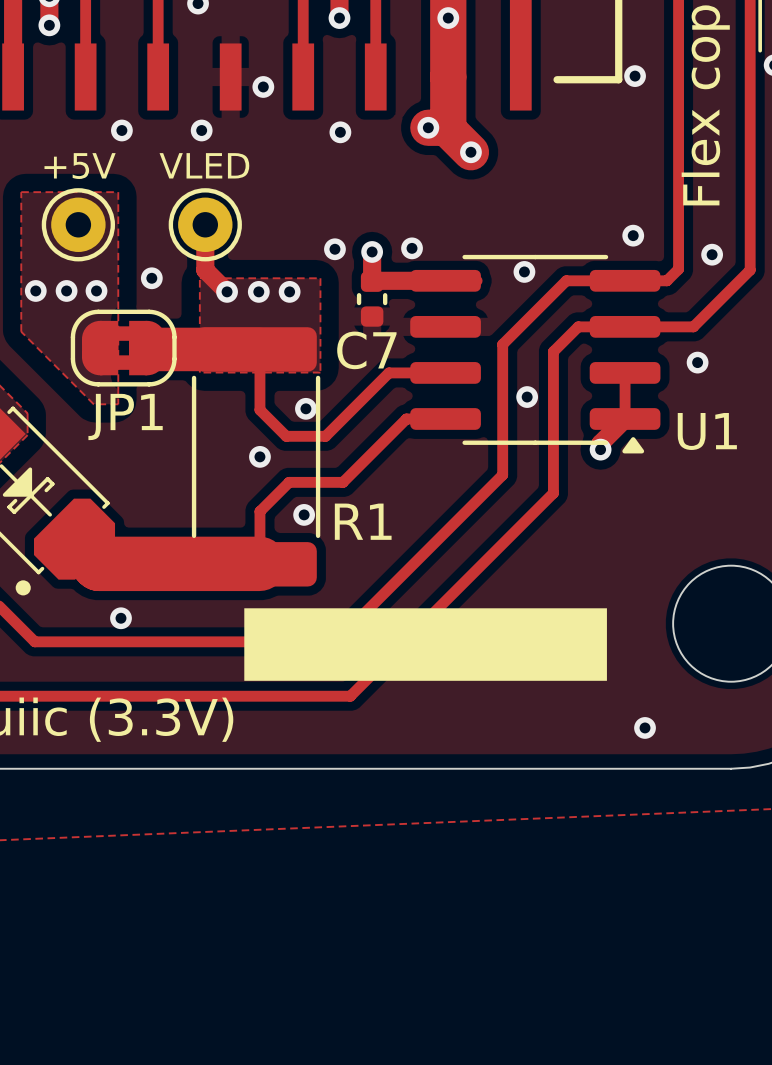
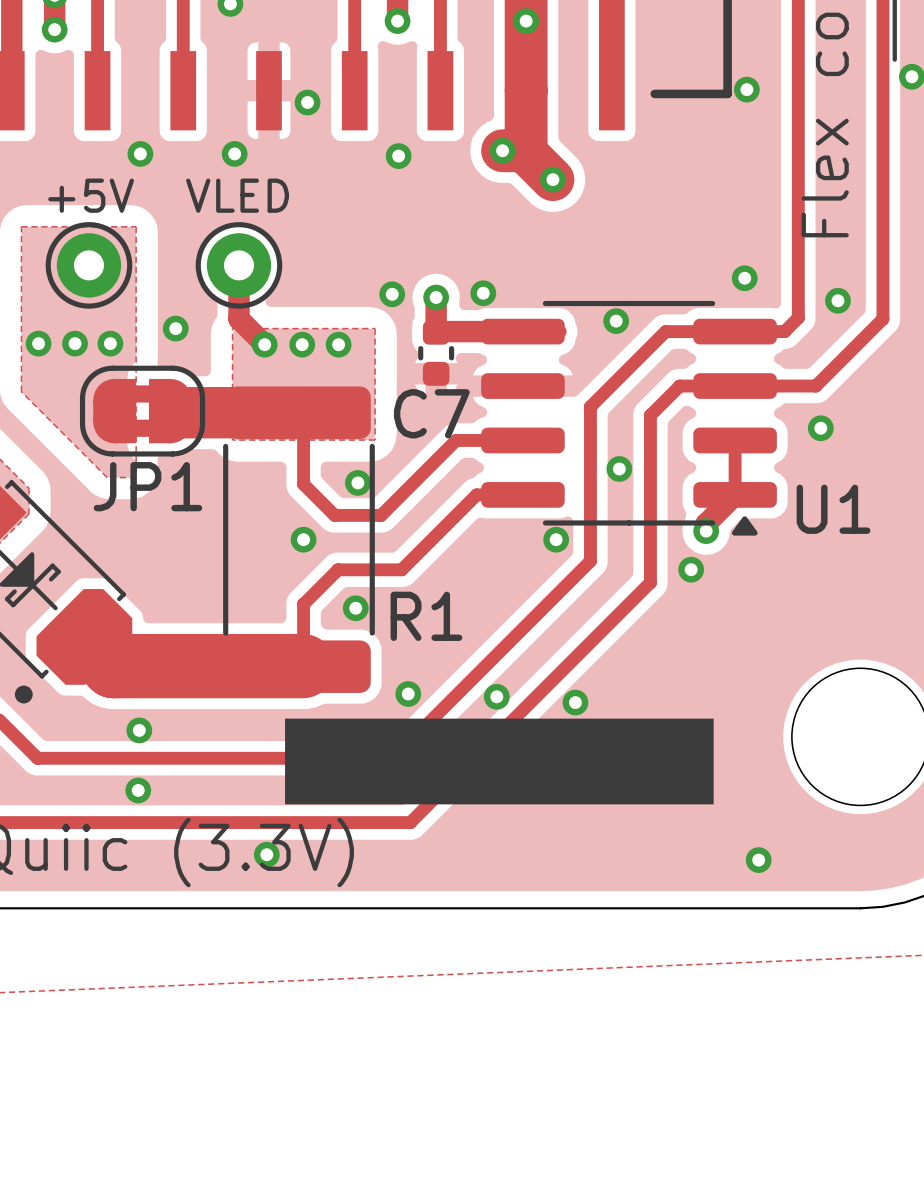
via: none -> (556, 539)
via: none -> (691, 569)
via: none -> (408, 693)
via: none -> (496, 696)
via: none -> (575, 702)
via: none -> (138, 790)
via: none -> (266, 854)

